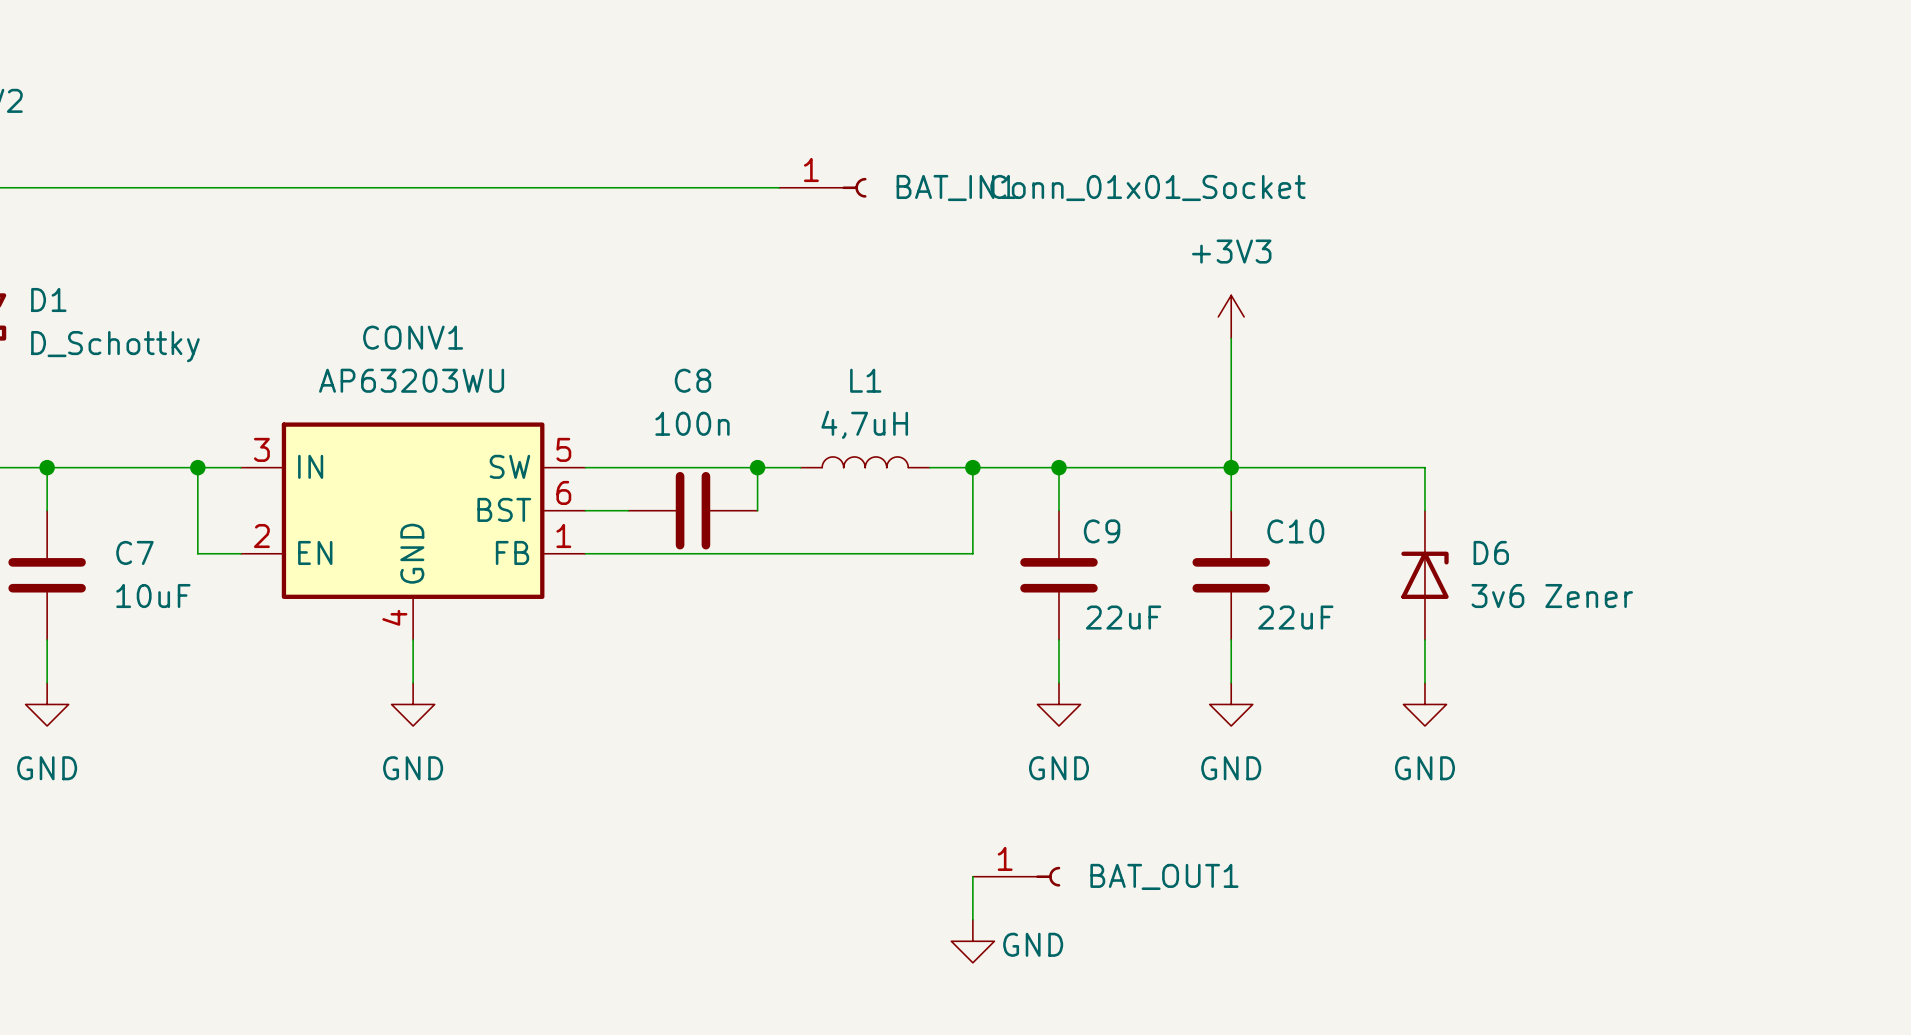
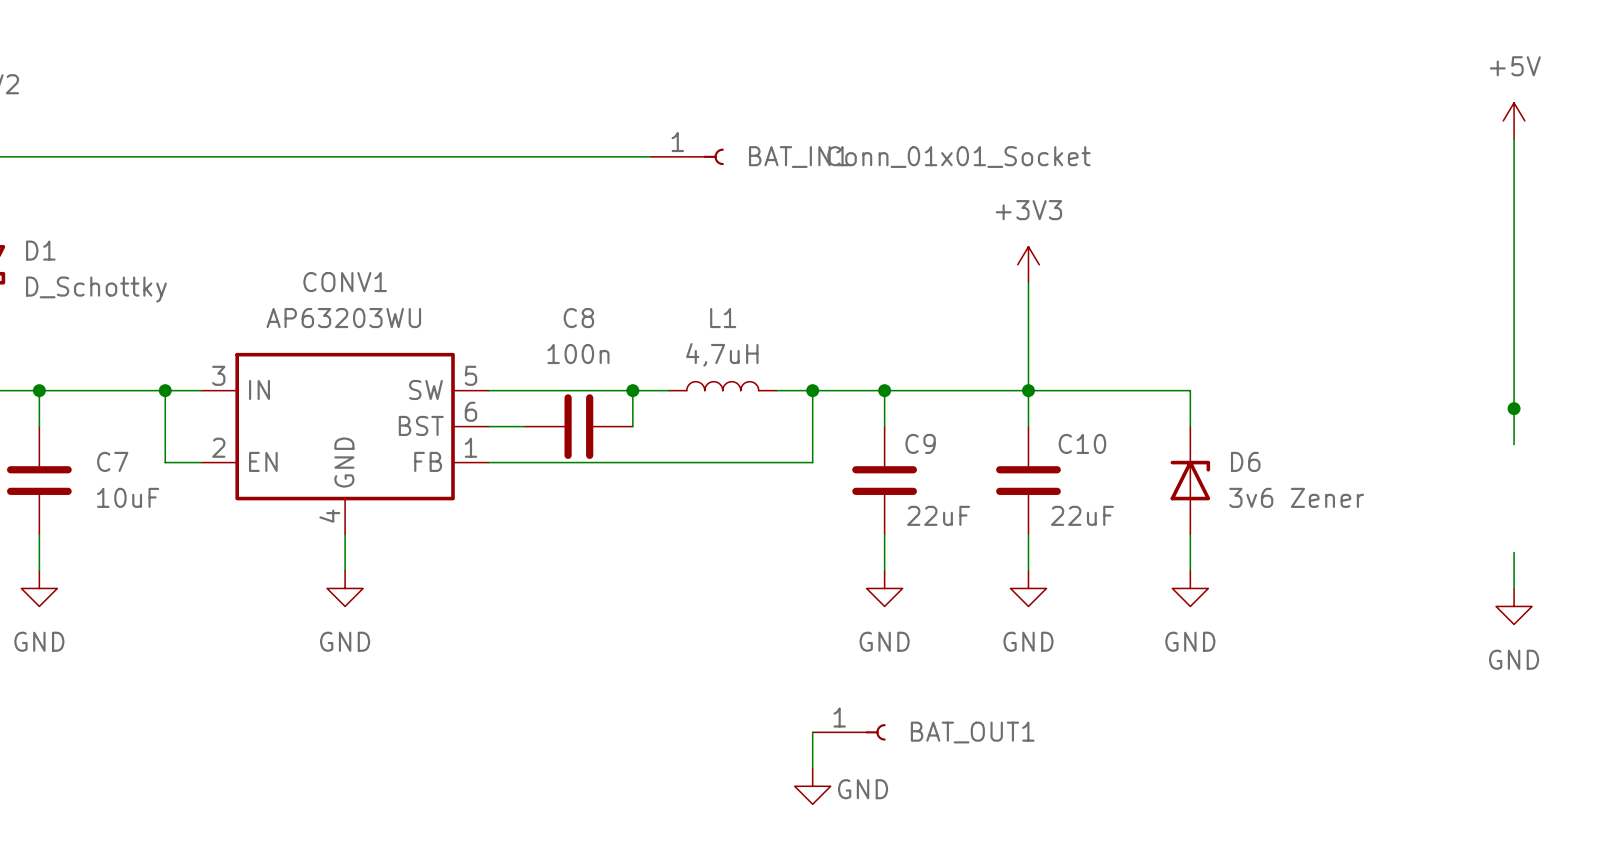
power symbol: none -> +5V (1514, 120)
wire: none -> (1514, 138) (1514, 444)
junction: none -> (1514, 408)
wire: none -> (1514, 552) (1514, 588)
power symbol: none -> GND (1514, 606)

